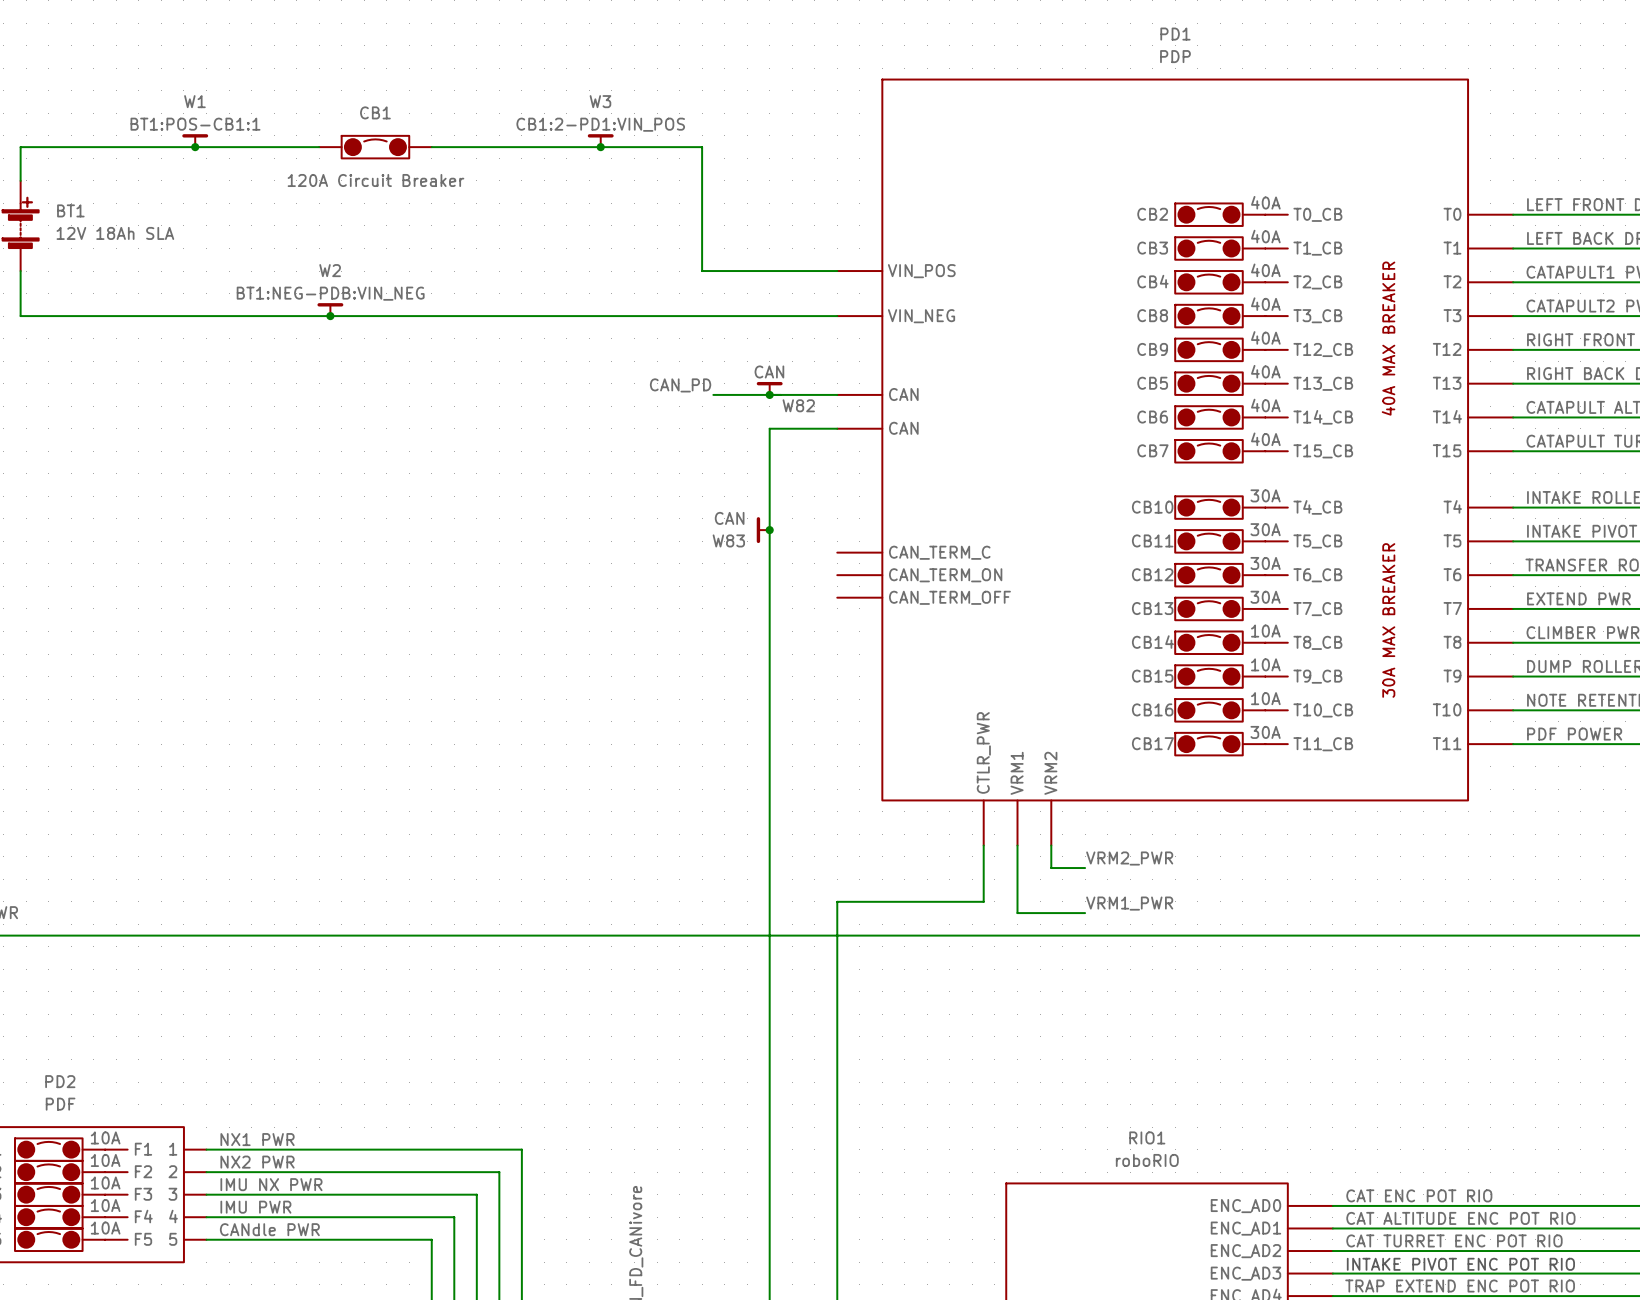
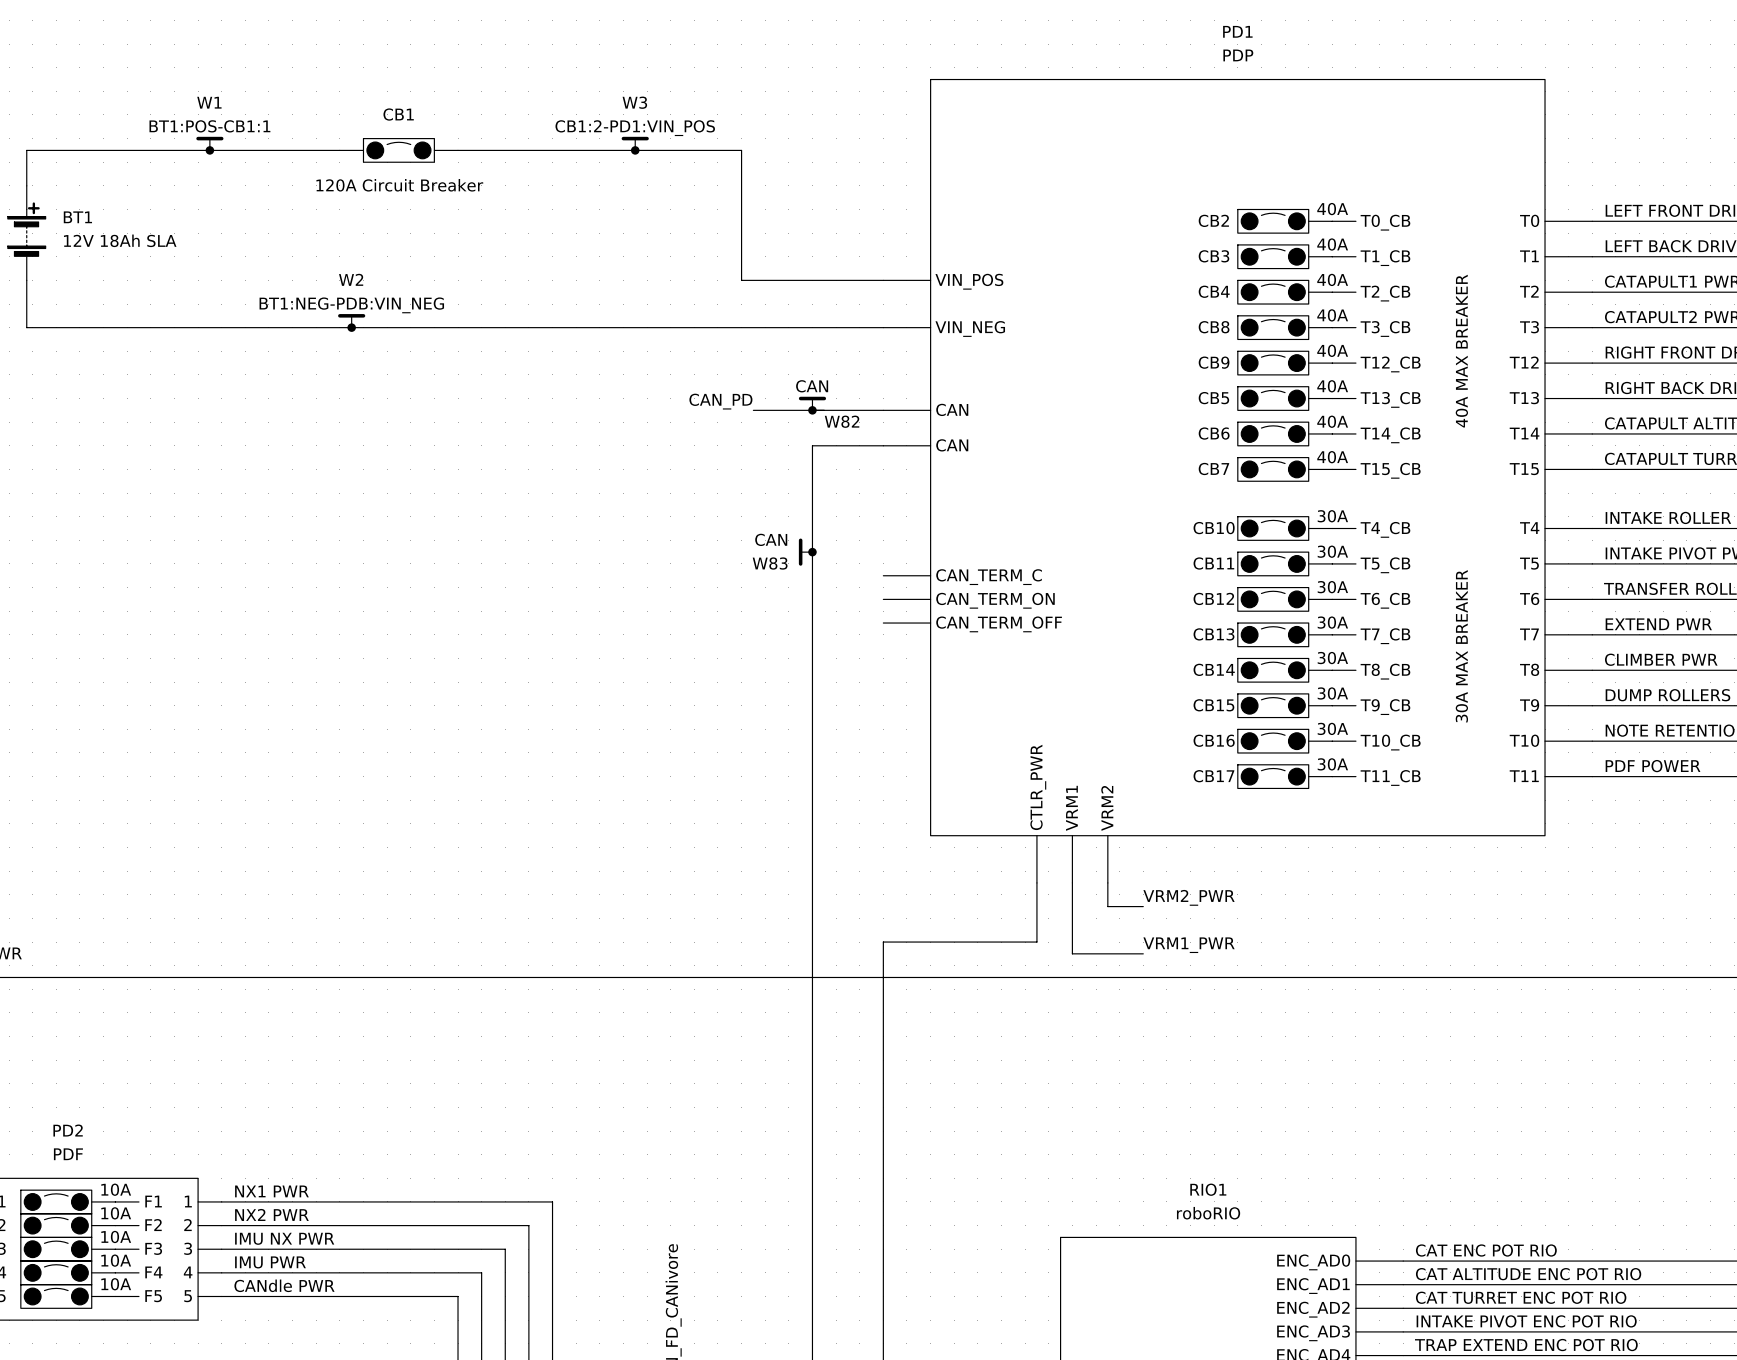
CB14 value: 10A (1265, 631) -> 30A (1332, 658)
CB15 value: 10A (1265, 664) -> 30A (1332, 693)
CB16 value: 10A (1265, 698) -> 30A (1332, 728)
label: none -> INTAKE PIVOT ENC POT RIO (1526, 1321)
text: INTAKE PIVOT ENC POT RIO (1460, 1264) -> none

